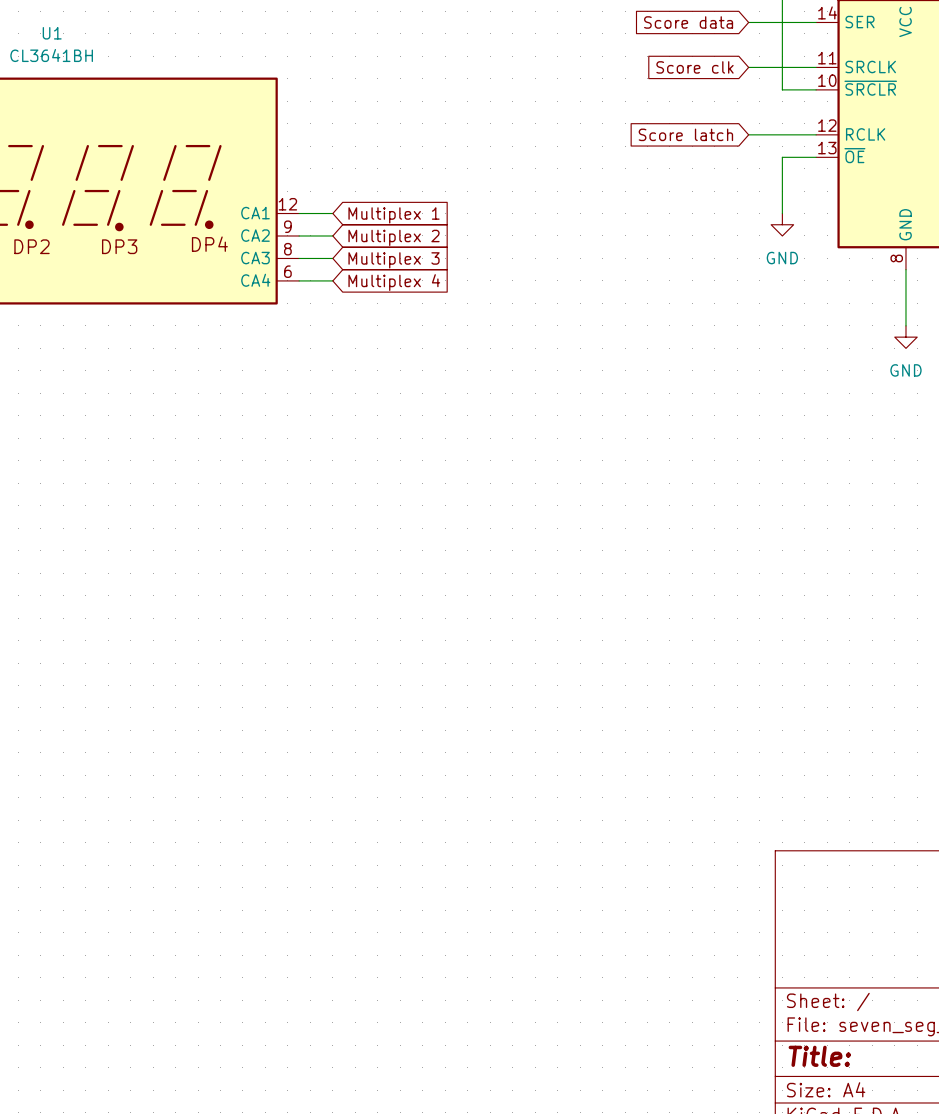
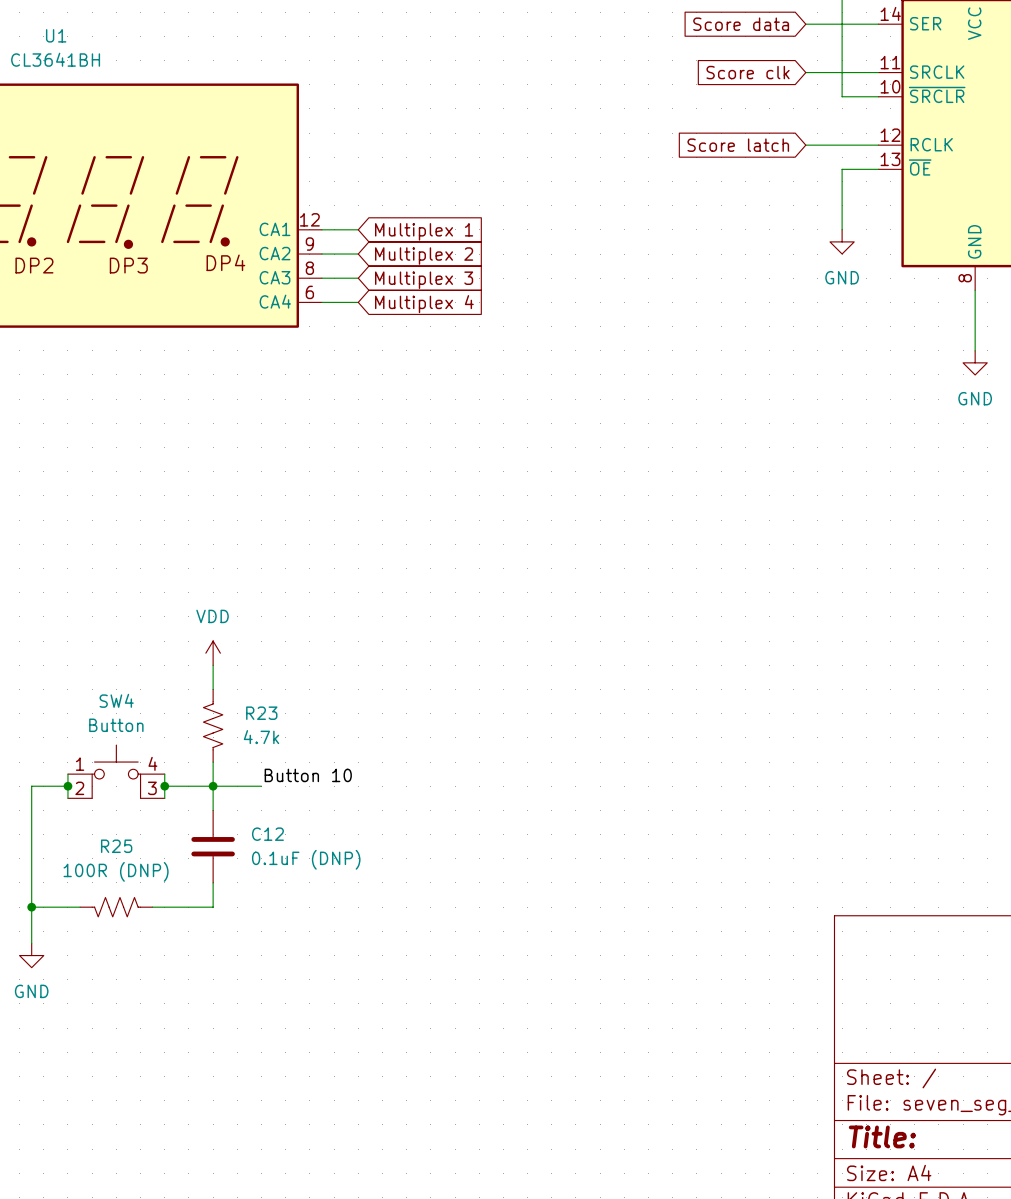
power symbol: none -> VDD (213, 653)
wire: none -> (213, 665) (213, 689)
R23: none -> 4.7k (213, 725)
wire: none -> (213, 762) (213, 810)
SW4: none -> Button (116, 771)
wire: none -> (67, 774) (67, 798)
wire: none -> (164, 774) (164, 798)
label: none -> Button 10 (308, 775)
wire: none -> (67, 786) (31, 786) (31, 943)
junction: none -> (67, 786)
wire: none -> (164, 786) (261, 786)
junction: none -> (164, 786)
junction: none -> (213, 786)
C12: none -> 0.1uF (DNP) (213, 846)
wire: none -> (213, 882) (213, 907) (152, 907)
wire: none -> (31, 907) (80, 907)
junction: none -> (31, 907)
R25: none -> 100R (DNP) (116, 907)
power symbol: none -> GND (31, 955)

